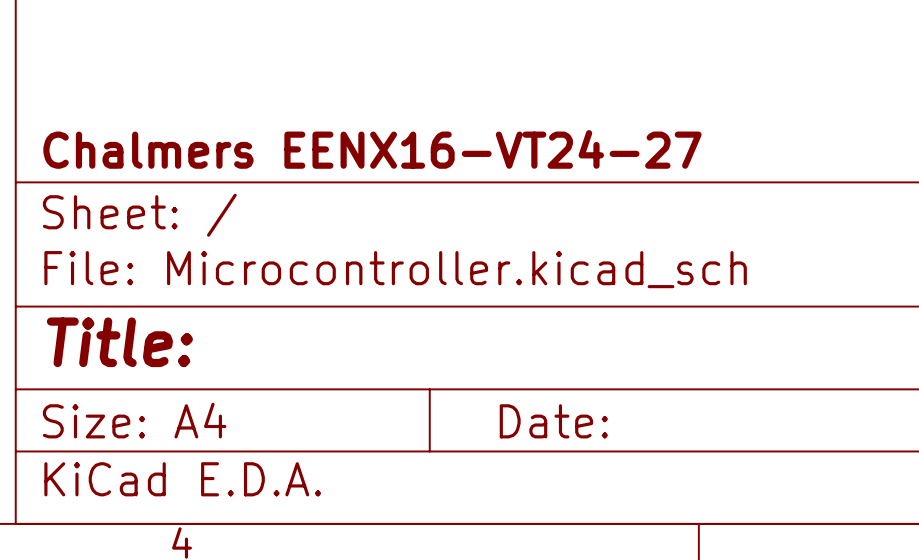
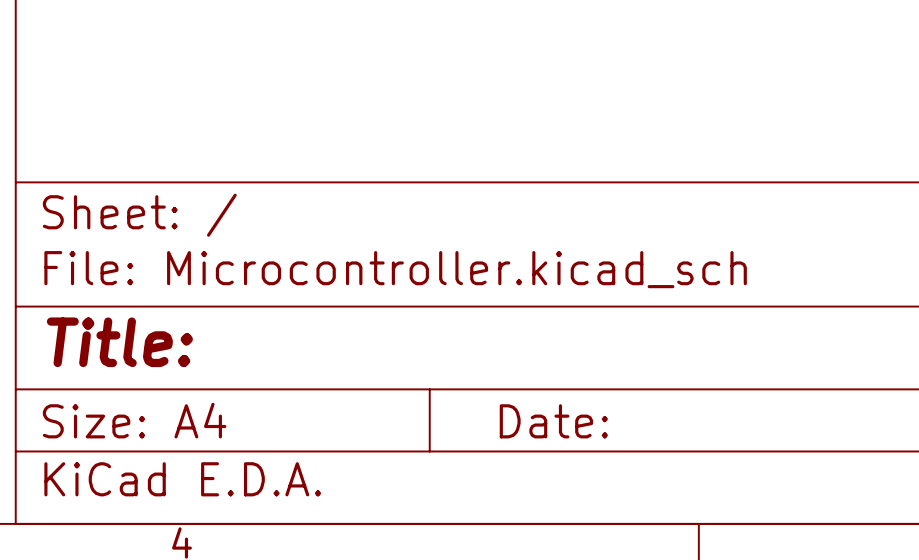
title block: Chalmers EENX16-VT24-27 (372, 149) -> none

